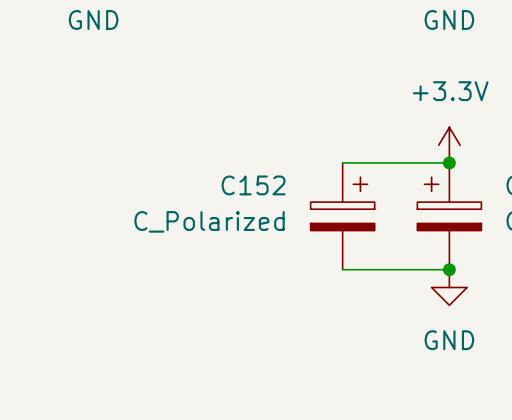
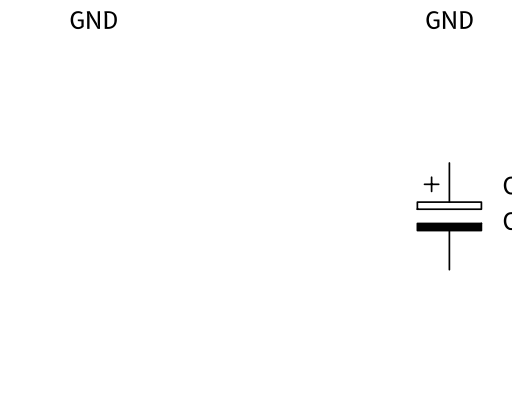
power symbol: +3.3V (449, 145) -> none
wire: (342, 162) (449, 162) -> none
junction: (449, 162) -> none
C152: C_Polarized (342, 216) -> none
wire: (342, 269) (449, 269) -> none
junction: (449, 269) -> none
power symbol: GND (449, 287) -> none

